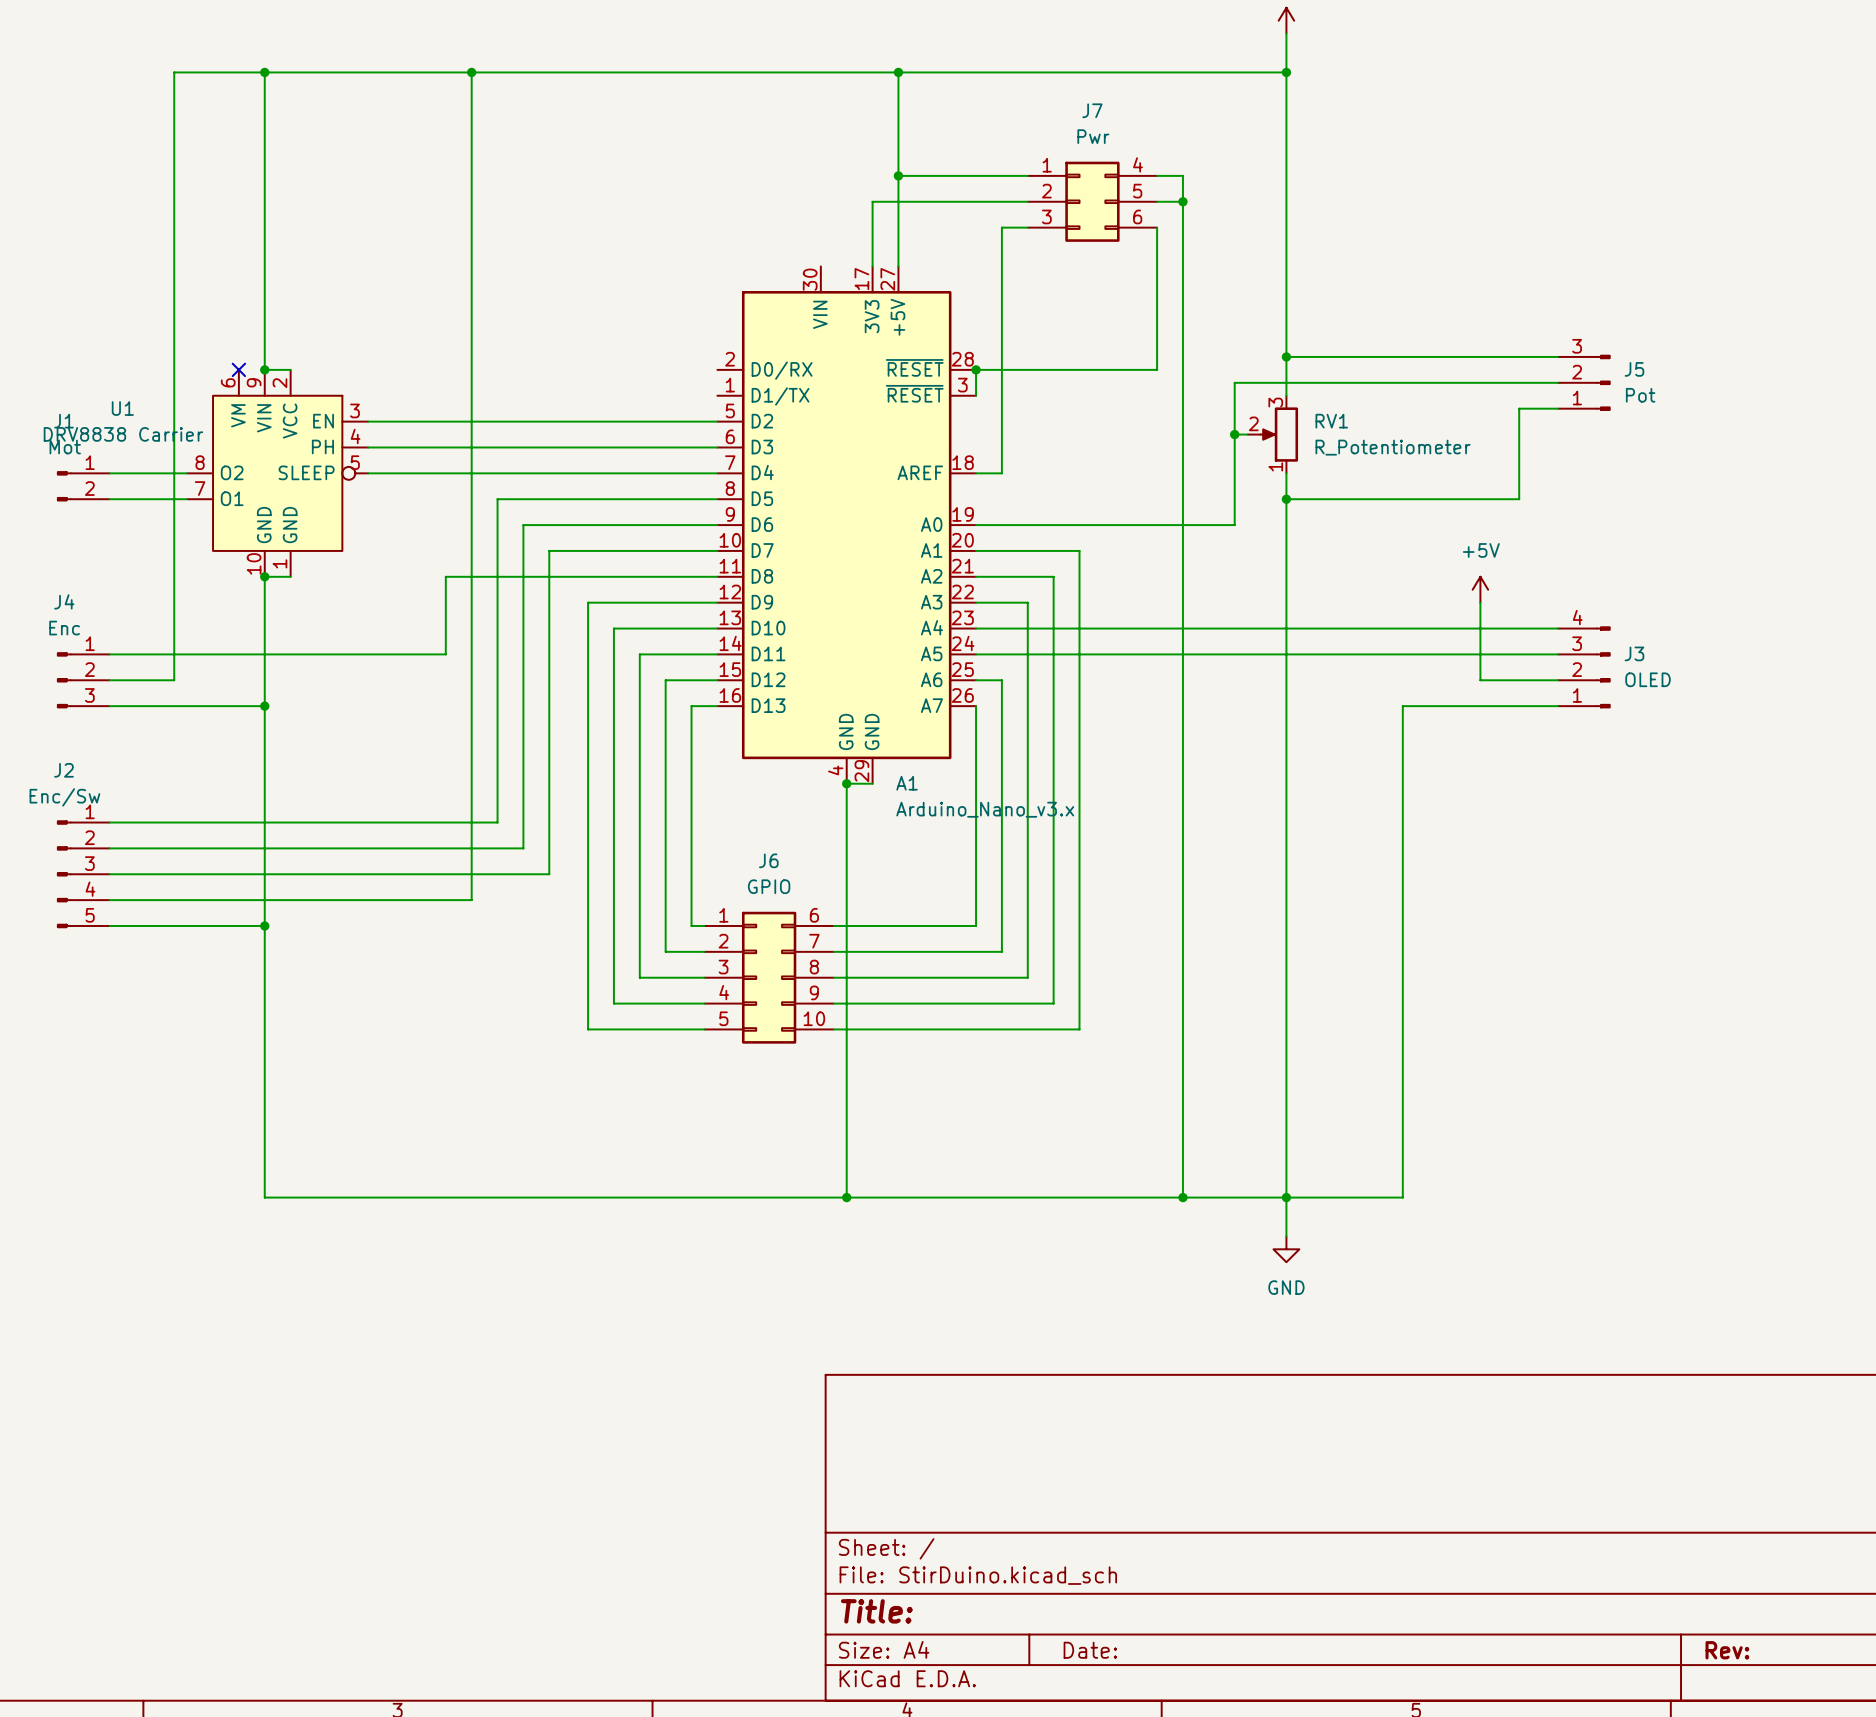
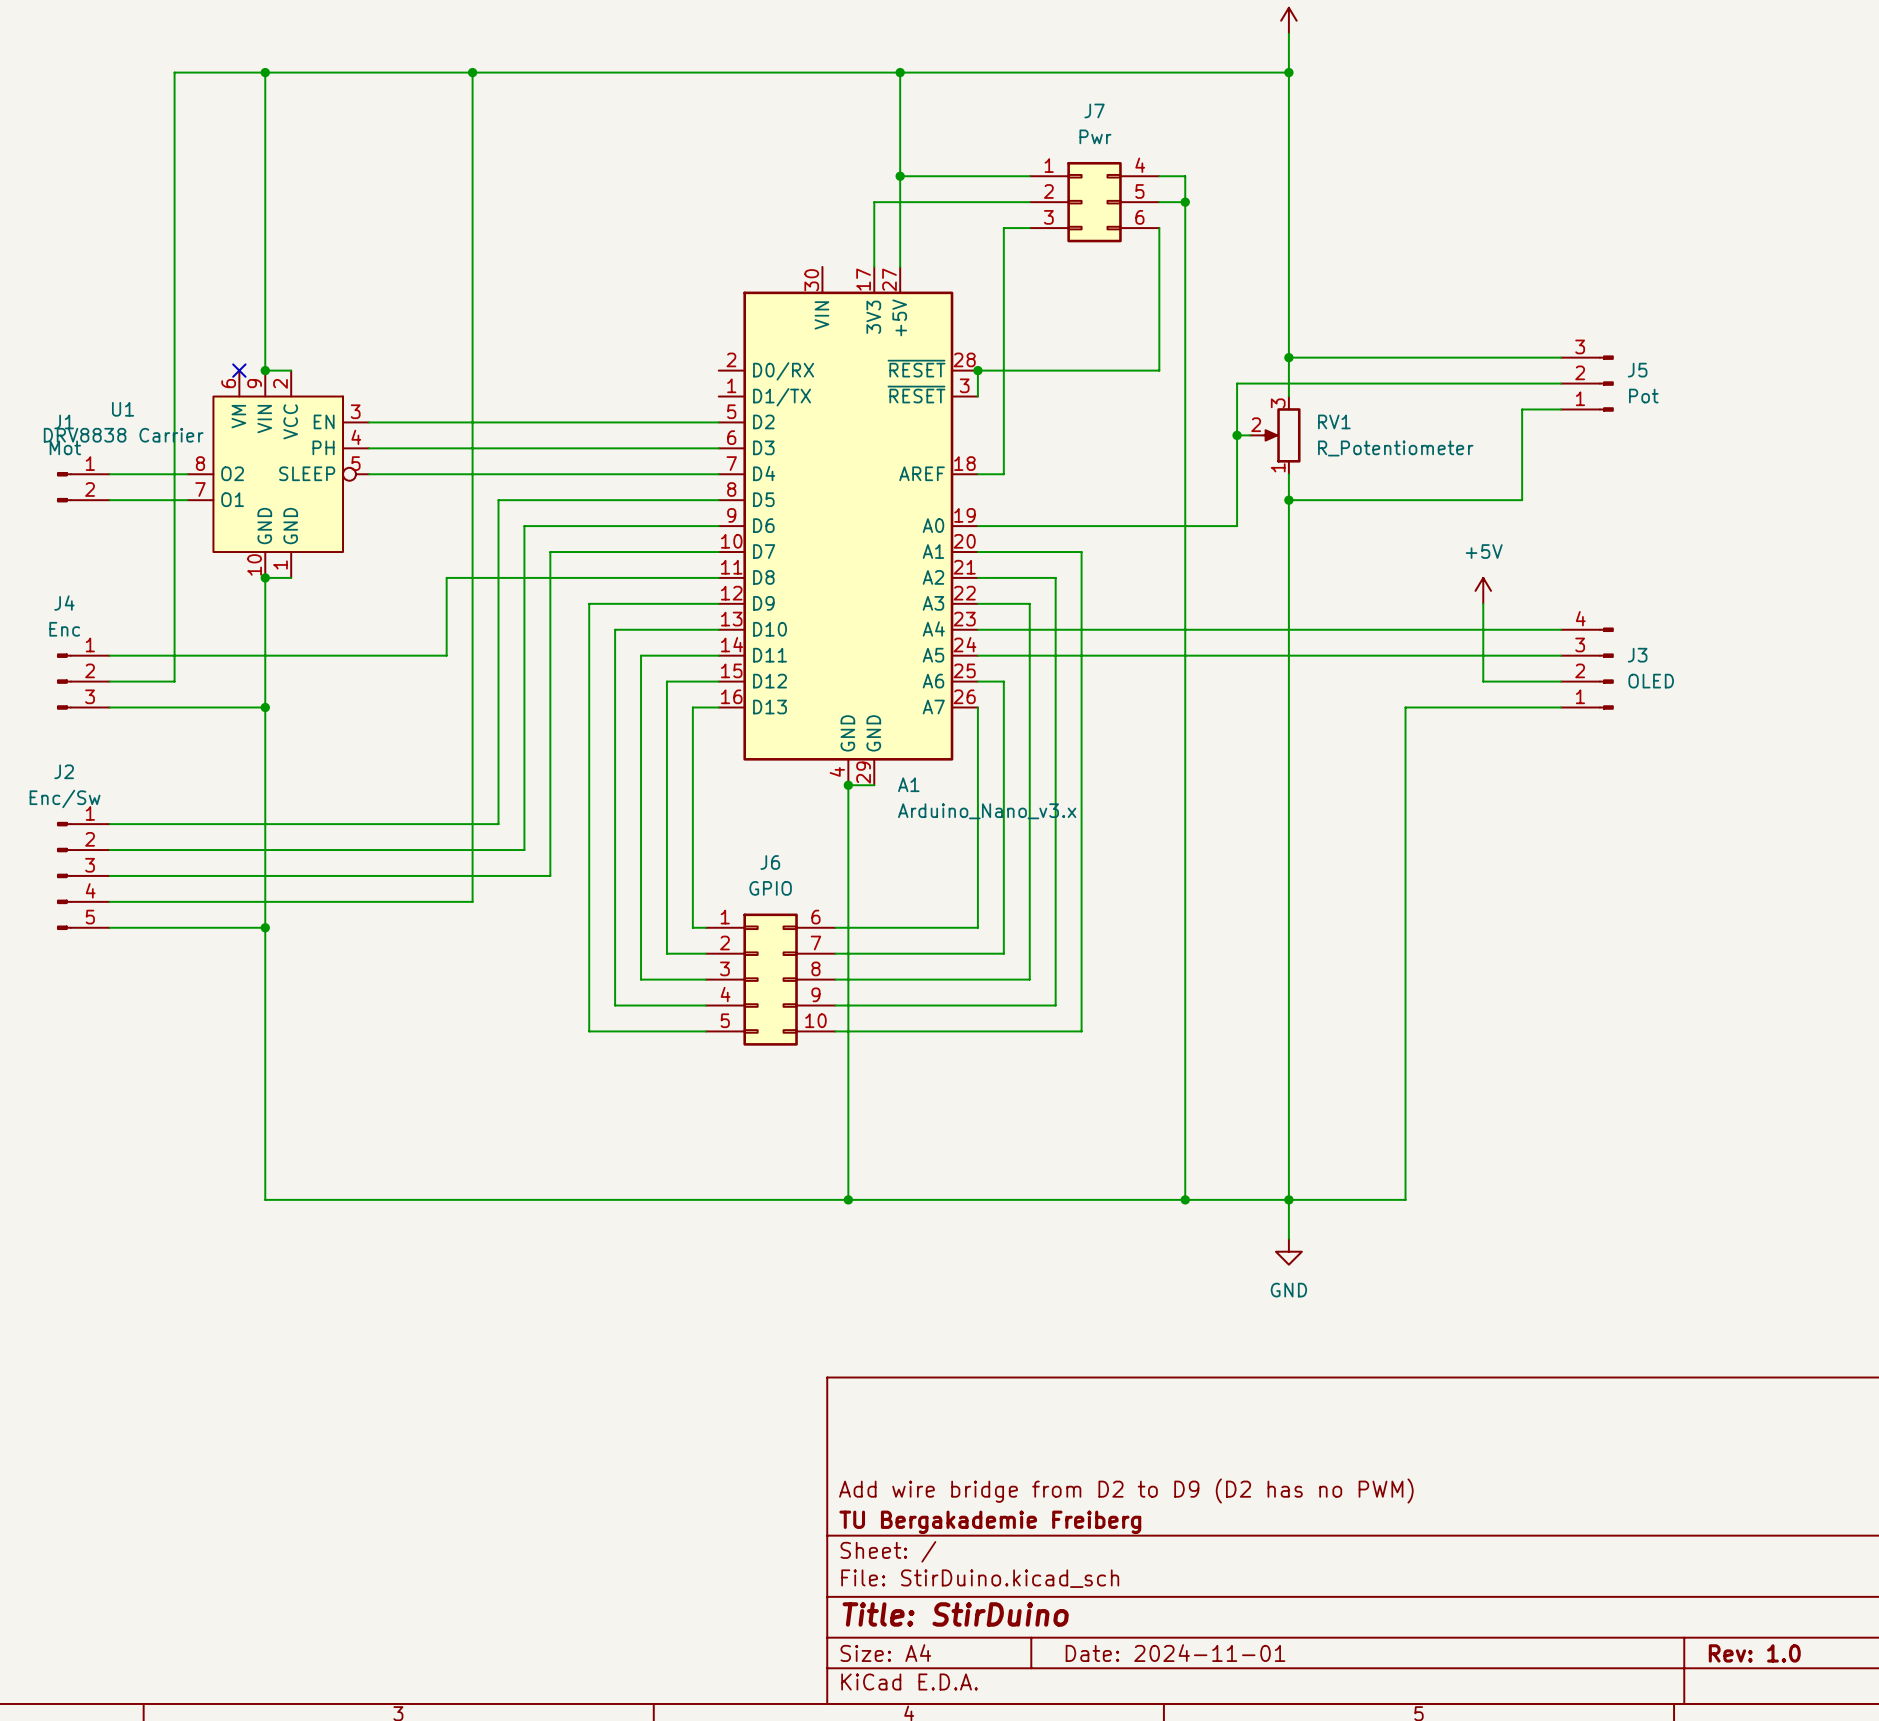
title block: none -> Add wire bridge from D2 to D9 (D2 has no PWM) (1126, 1490)
title block: none -> TU Bergakademie Freiberg (990, 1522)
title block: Title: (876, 1611) -> Title: StirDuino (955, 1614)
title block: Date: (1090, 1650) -> Date: 2024-11-01 (1175, 1653)
title block: Rev: (1727, 1650) -> Rev: 1.0 (1754, 1653)

